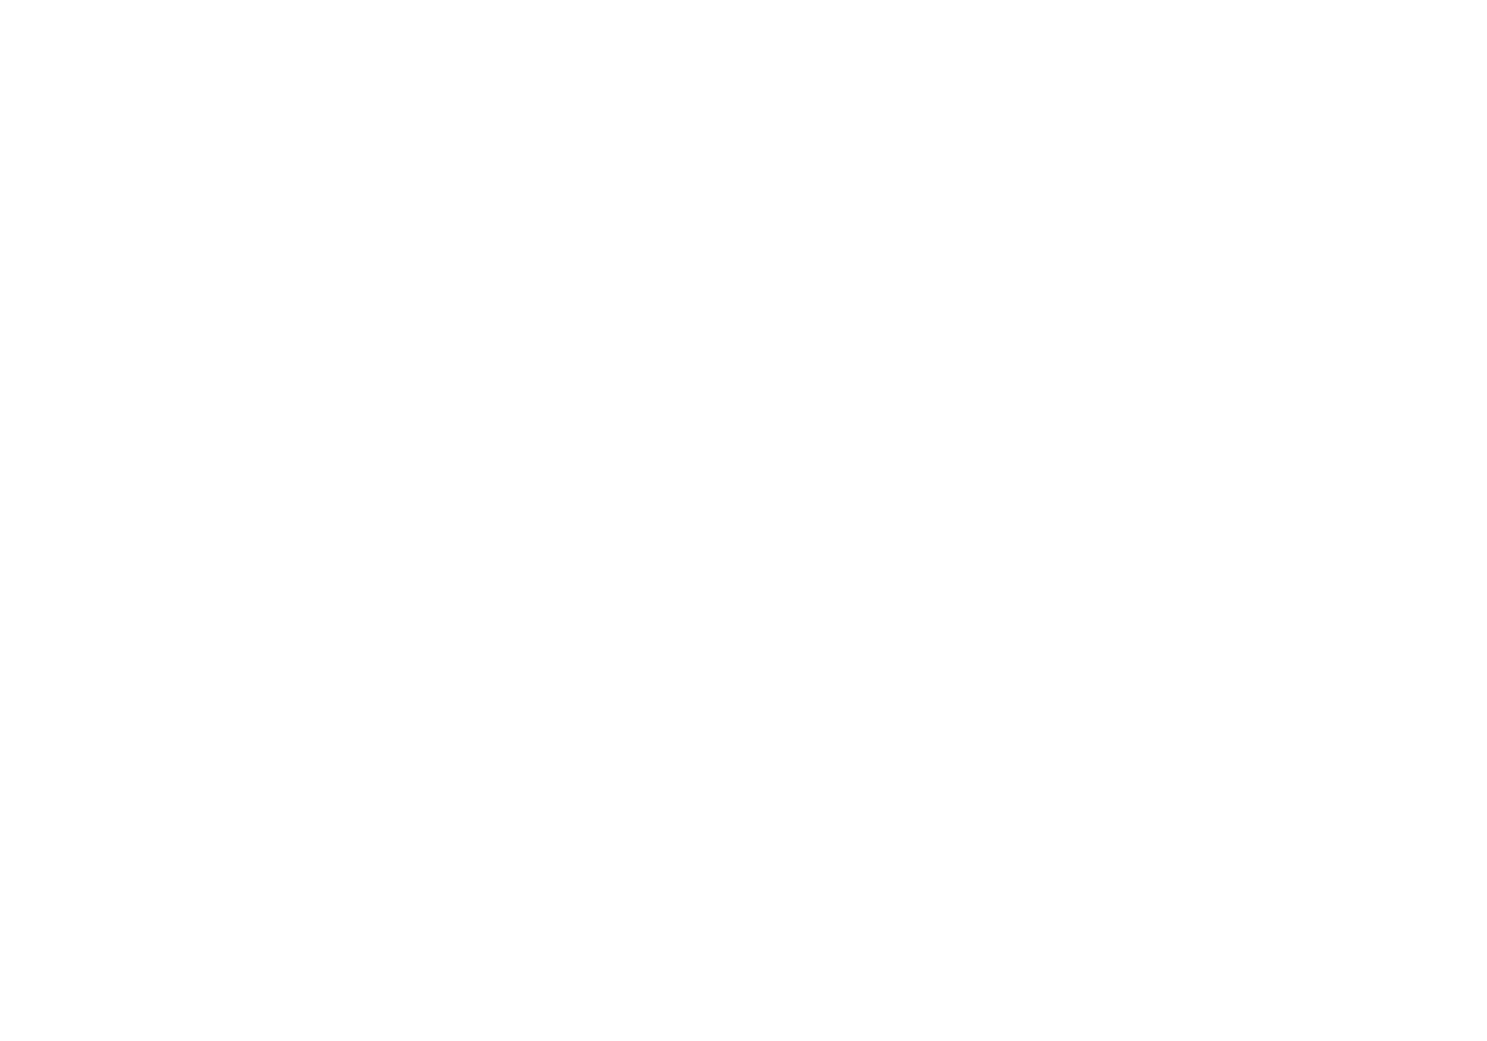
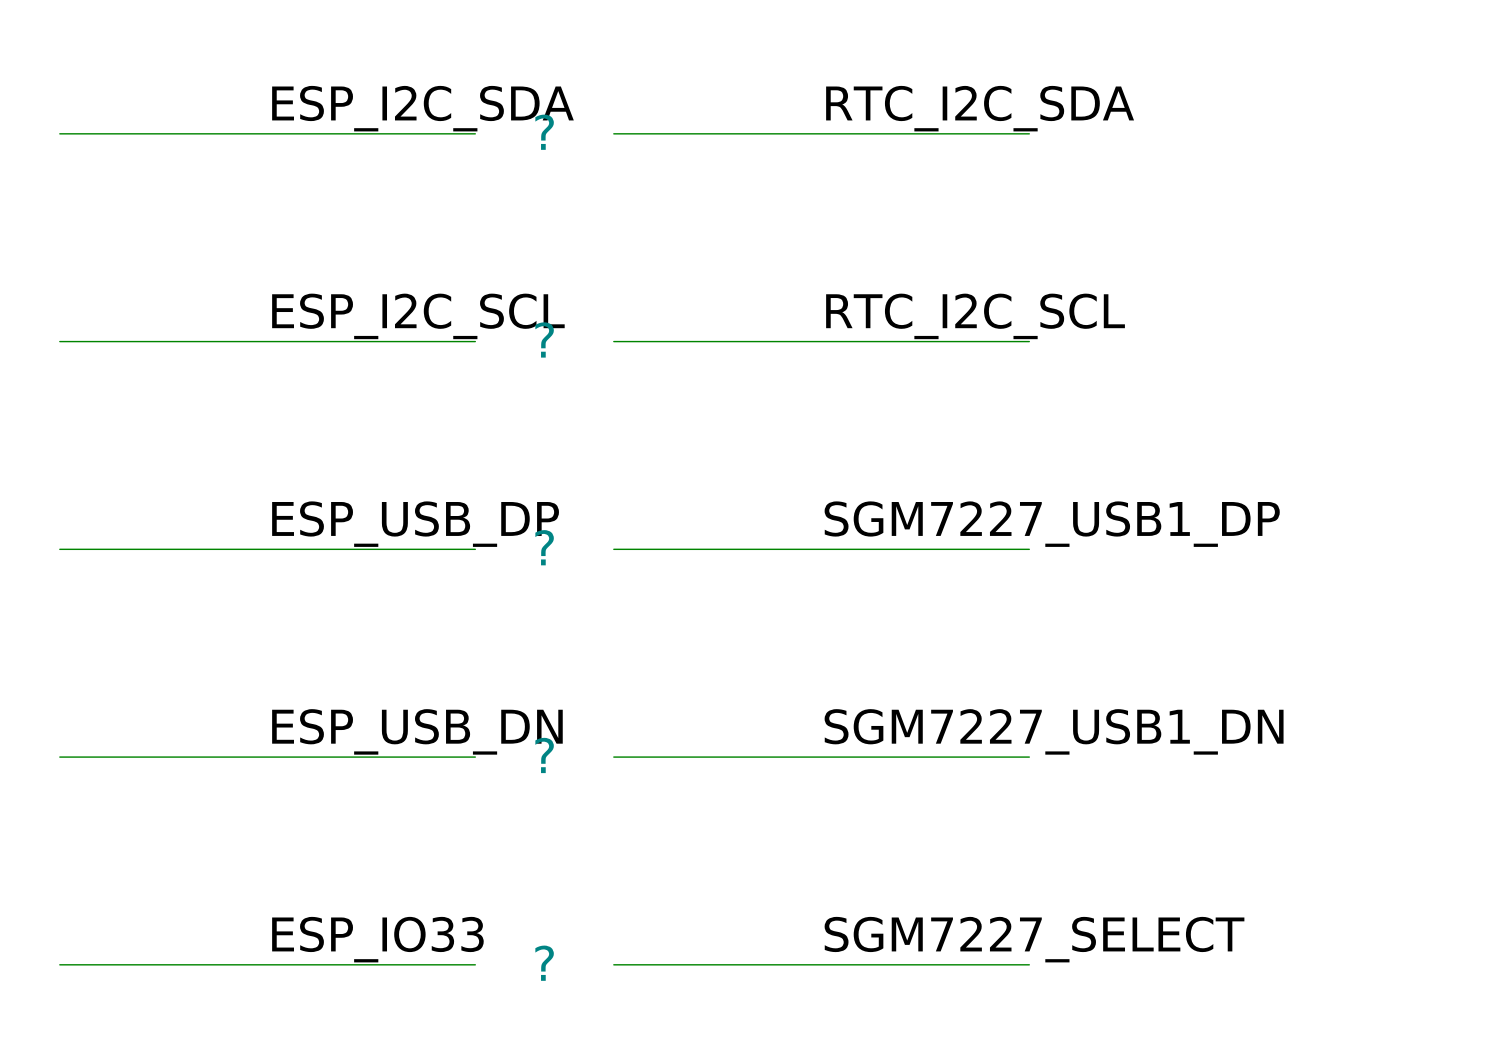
label: none -> ESP_I2C_SDA (422, 108)
label: none -> RTC_I2C_SDA (980, 108)
part: none -> (544, 132)
wire: none -> (59, 133) (475, 133)
wire: none -> (613, 133) (1029, 133)
label: none -> ESP_I2C_SCL (418, 316)
label: none -> RTC_I2C_SCL (975, 316)
part: none -> (544, 339)
wire: none -> (59, 341) (475, 341)
wire: none -> (613, 341) (1029, 341)
label: none -> ESP_USB_DP (415, 524)
label: none -> SGM7227_USB1_DP (1052, 524)
part: none -> (544, 547)
wire: none -> (59, 549) (475, 549)
wire: none -> (613, 549) (1029, 549)
label: none -> ESP_USB_DN (417, 731)
label: none -> SGM7227_USB1_DN (1054, 731)
part: none -> (544, 755)
wire: none -> (59, 757) (475, 757)
wire: none -> (613, 757) (1029, 757)
label: none -> ESP_IO33 (377, 939)
label: none -> SGM7227_SELECT (1034, 939)
part: none -> (544, 963)
wire: none -> (59, 964) (475, 964)
wire: none -> (613, 964) (1029, 964)

